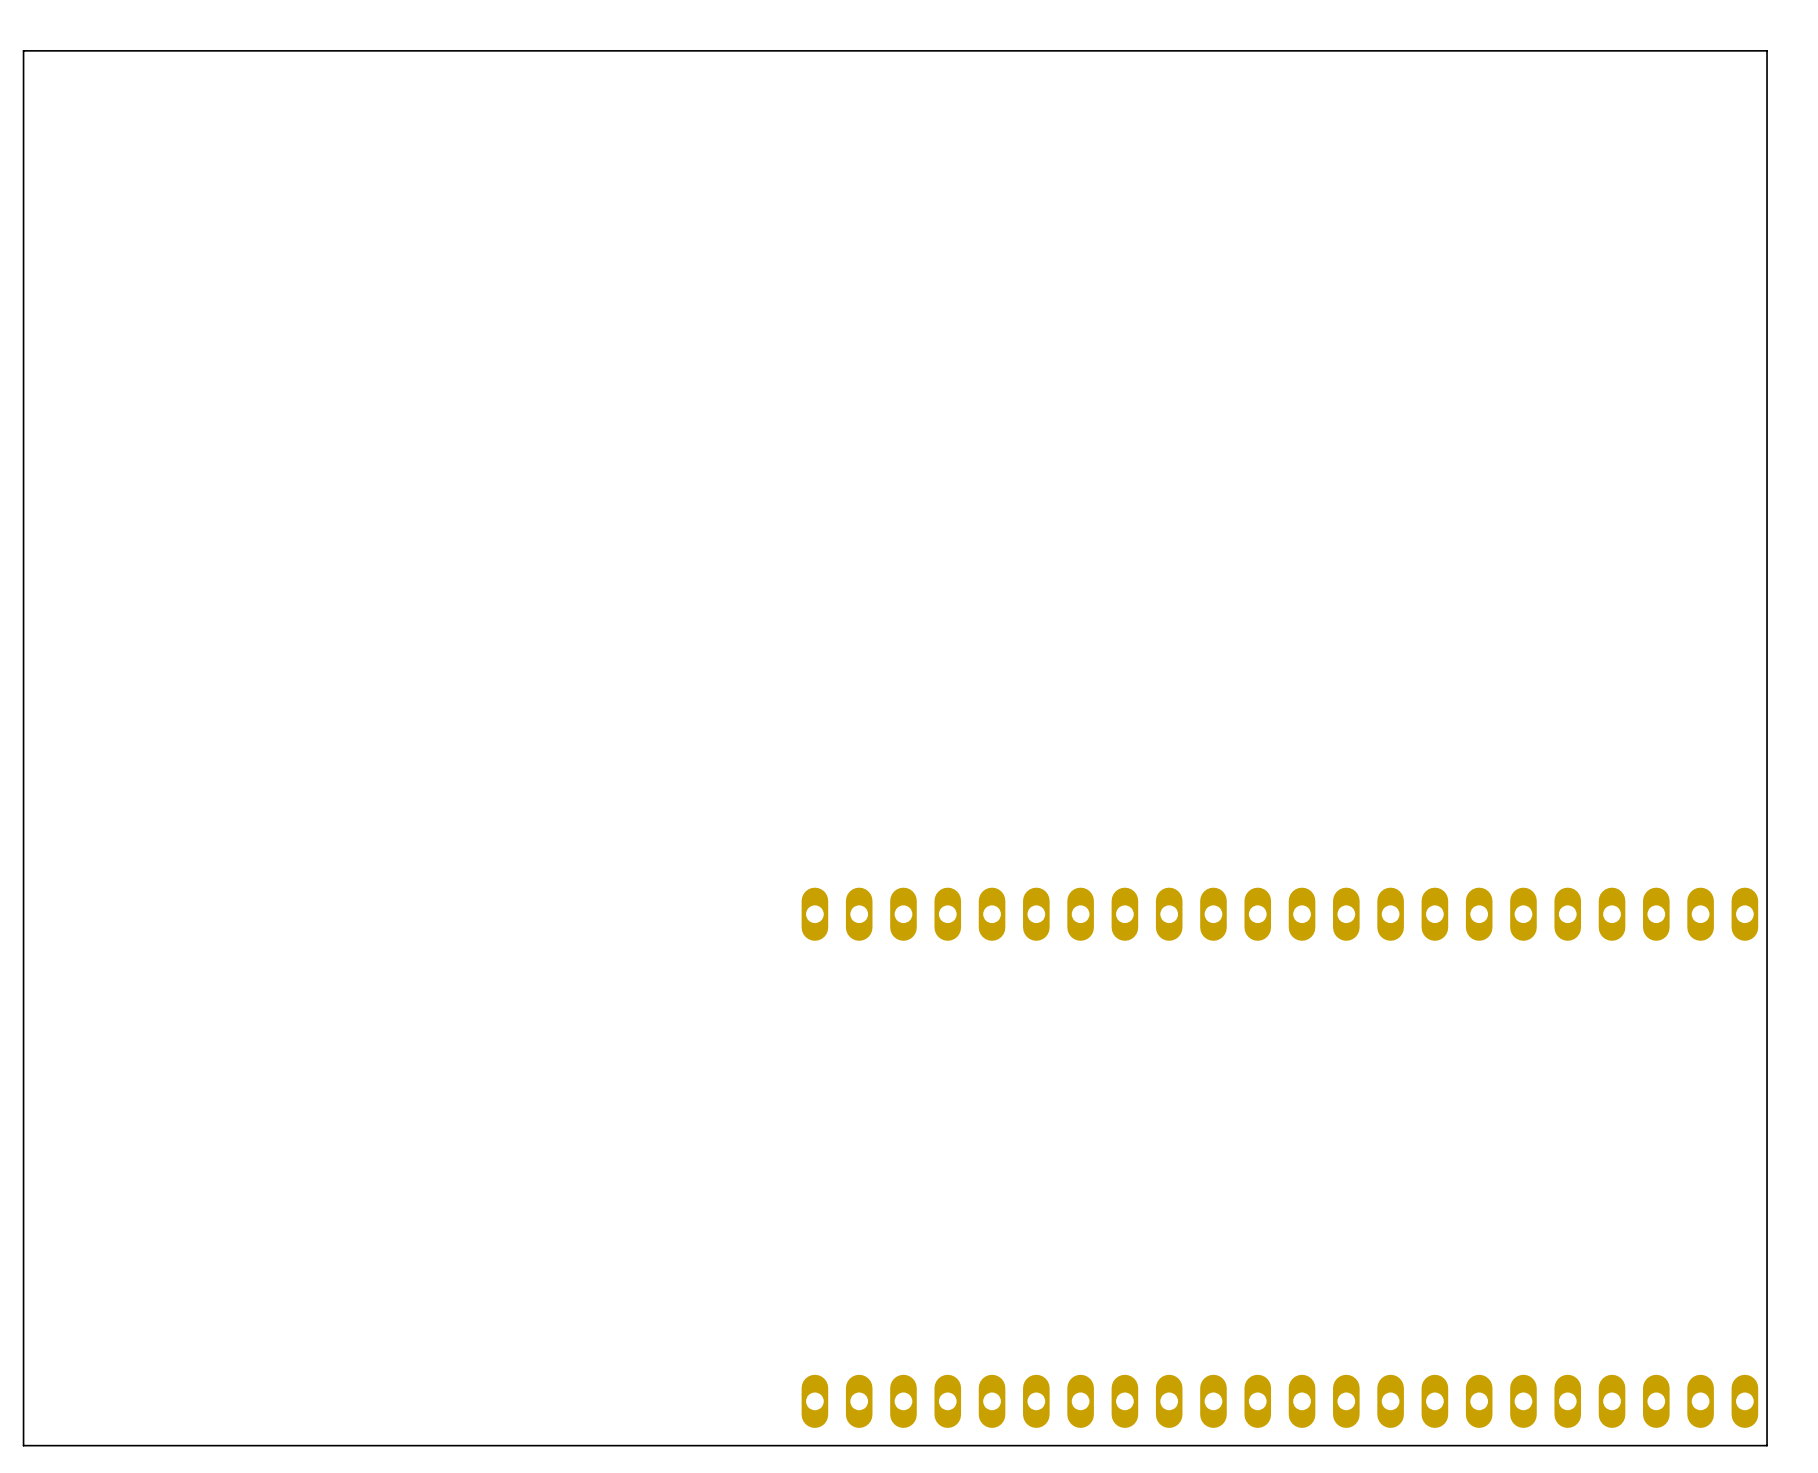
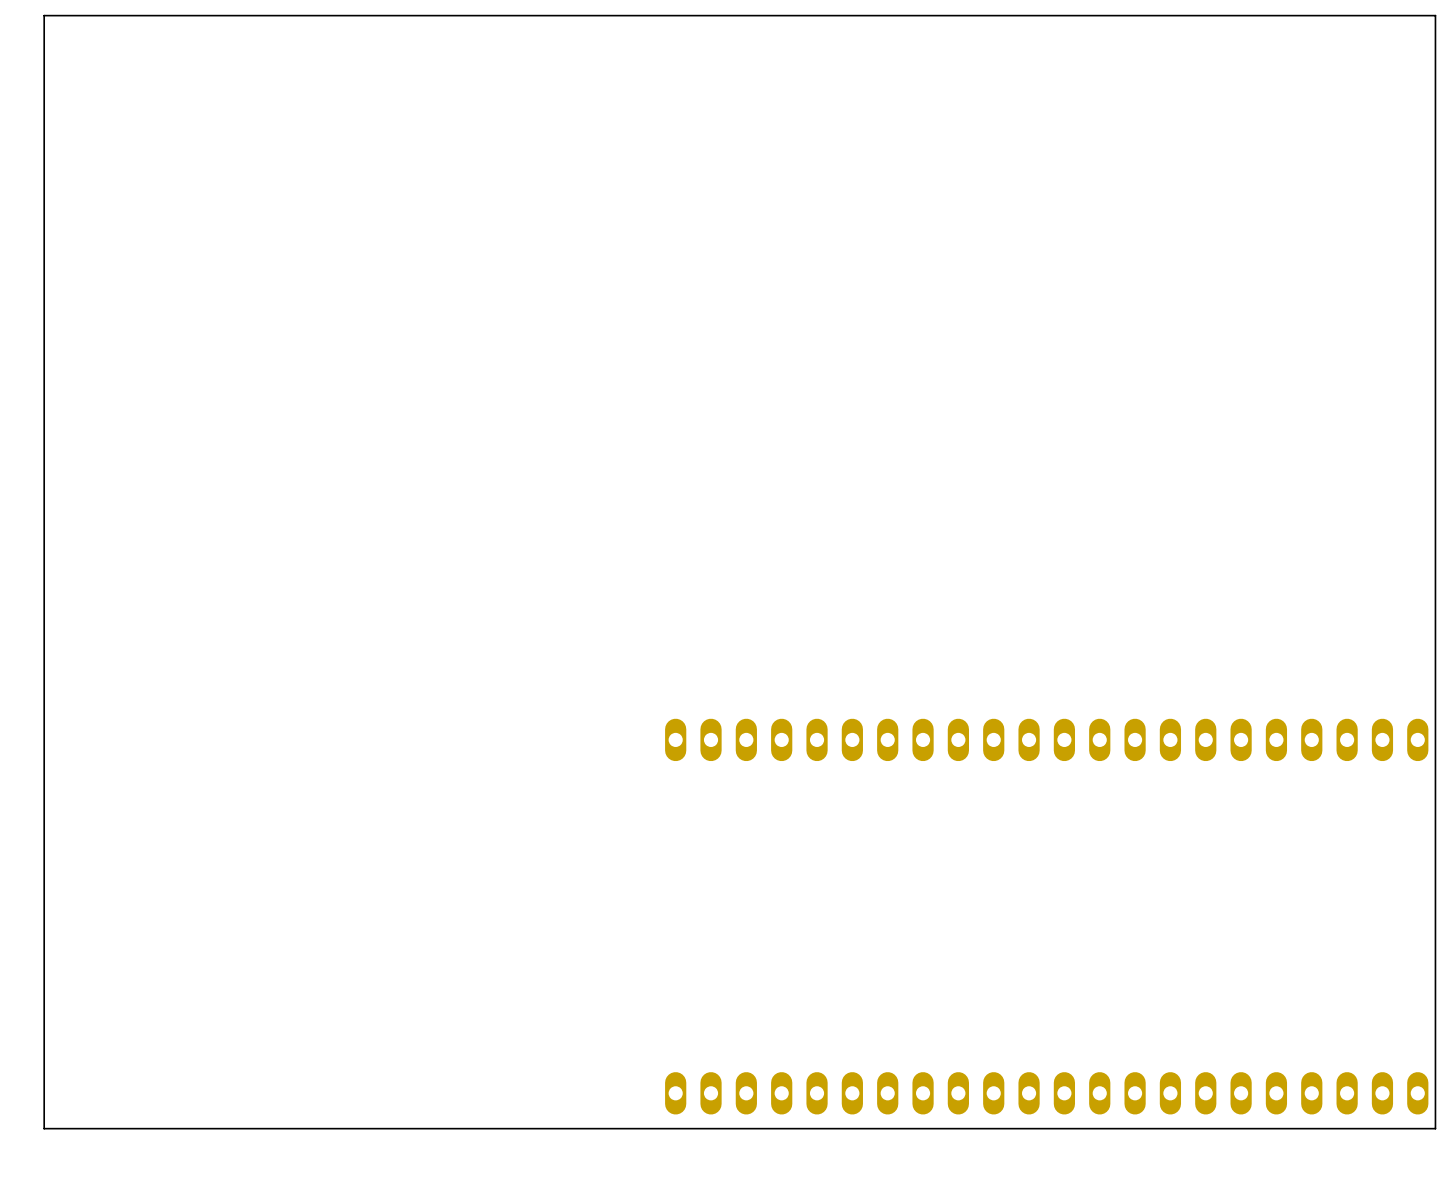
part position: (1279, 914) -> (1046, 739)

